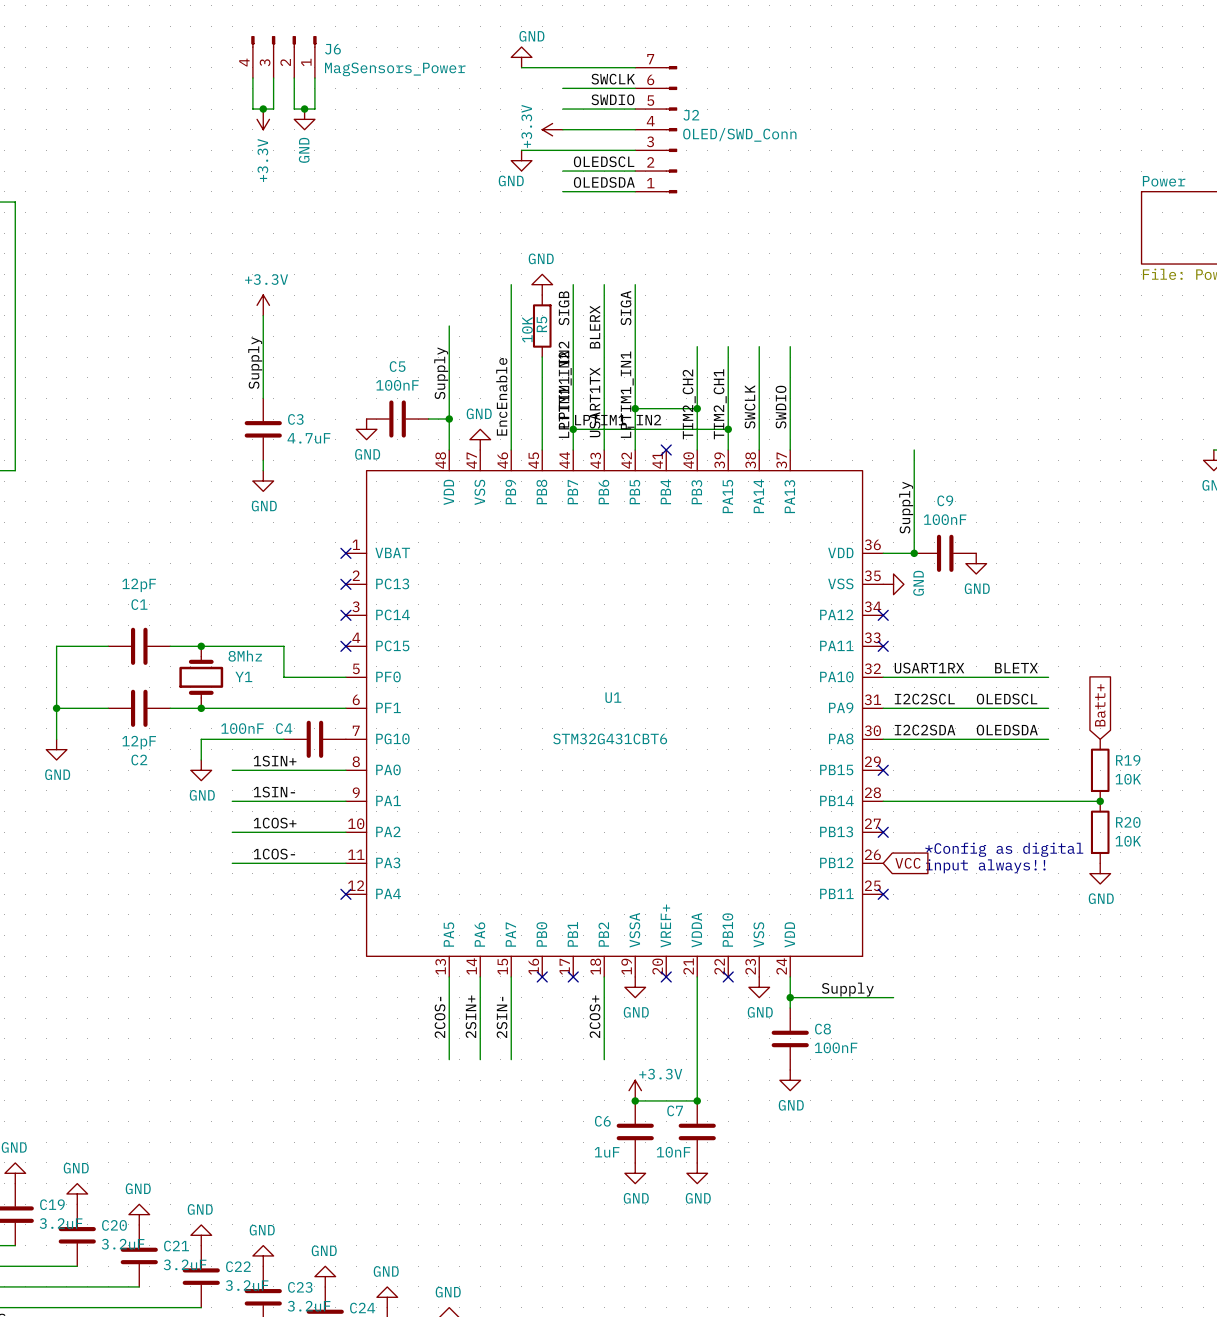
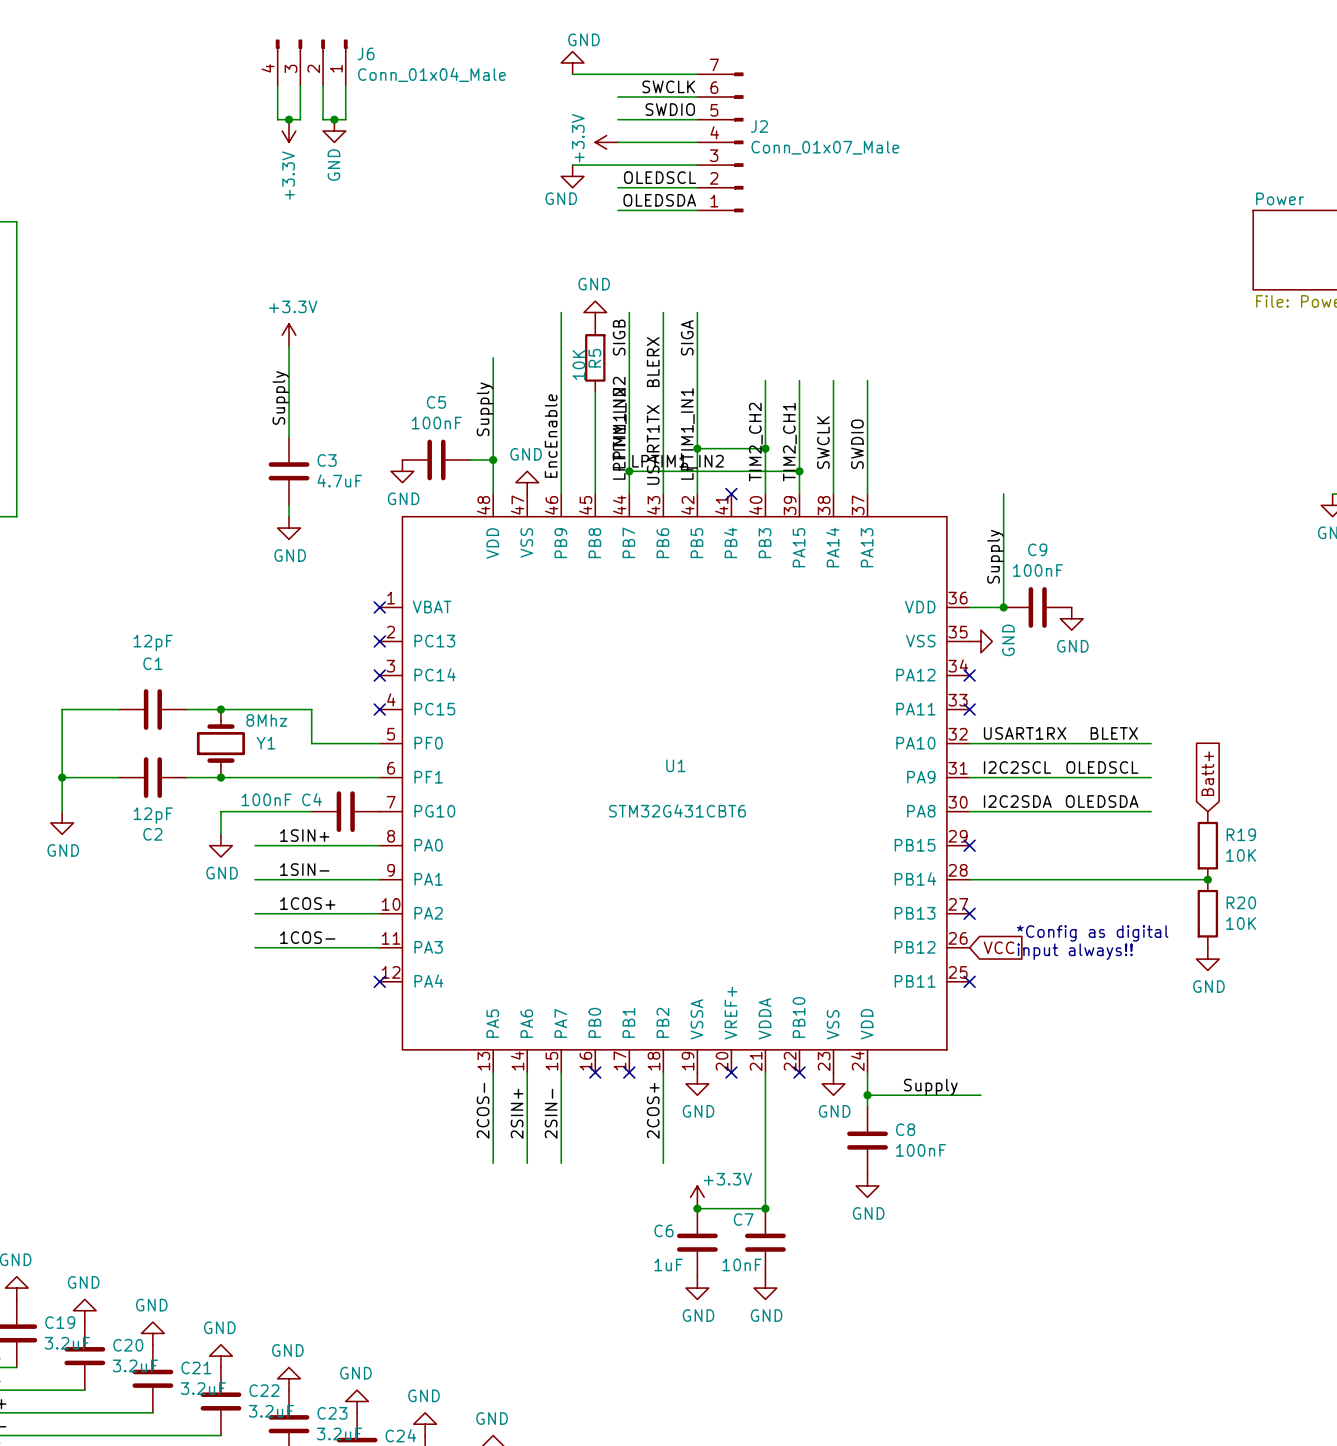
J6 value: MagSensors_Power (395, 69) -> Conn_01x04_Male (431, 74)
J2 value: OLED/SWD_Conn (739, 134) -> Conn_01x07_Male (825, 147)

